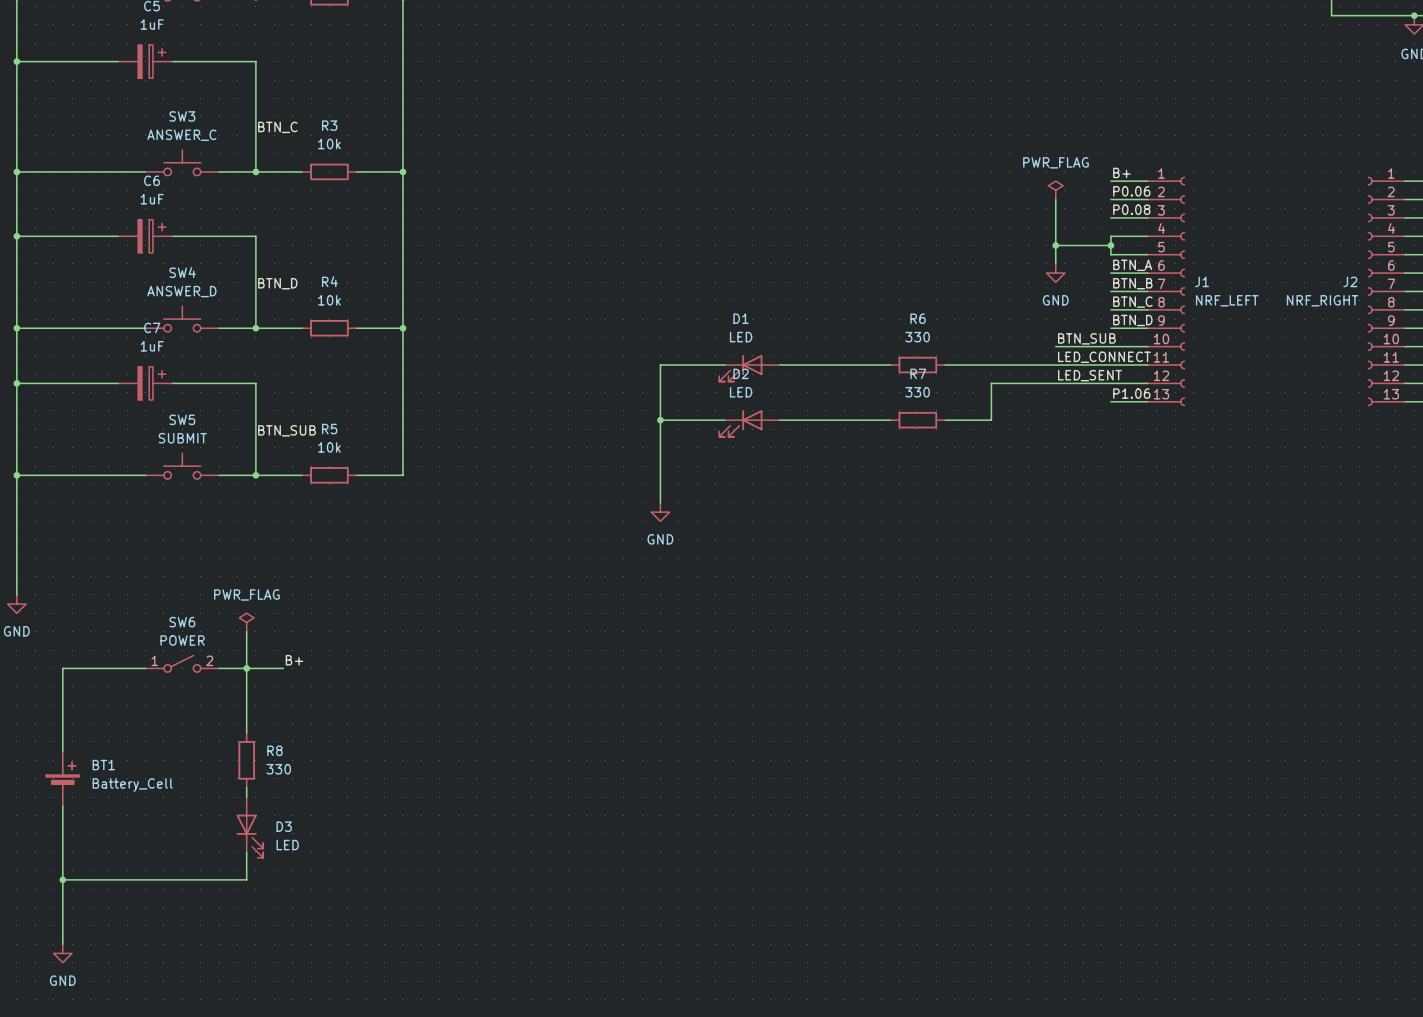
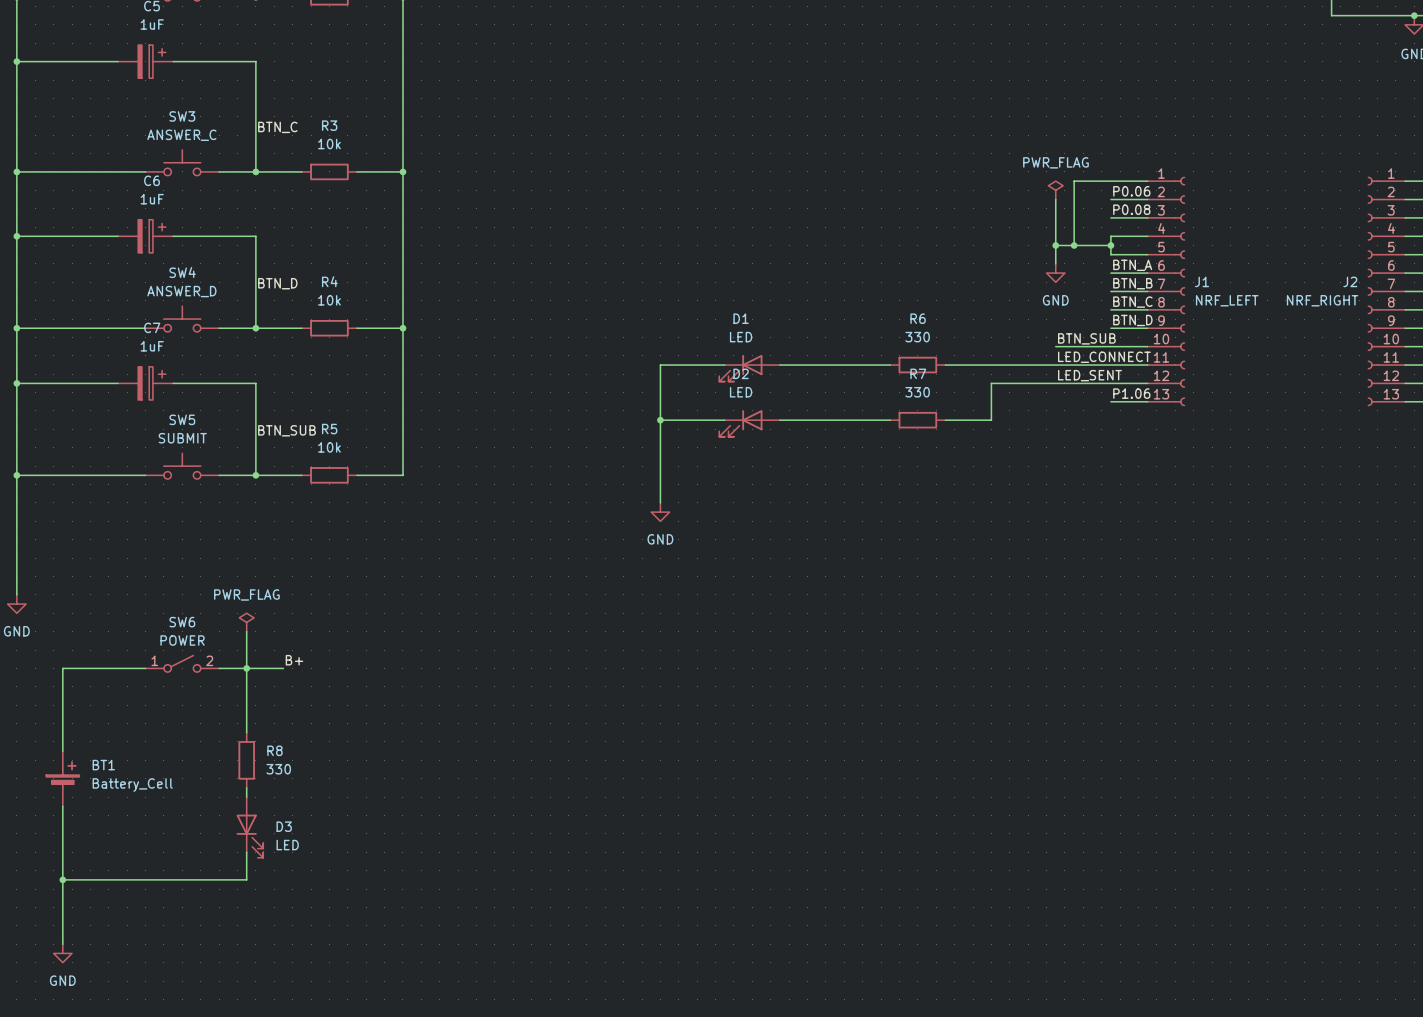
label: B+ (1121, 172) -> none
wire: none -> (1110, 181) (1074, 181) (1074, 245)
junction: none -> (1074, 245)

